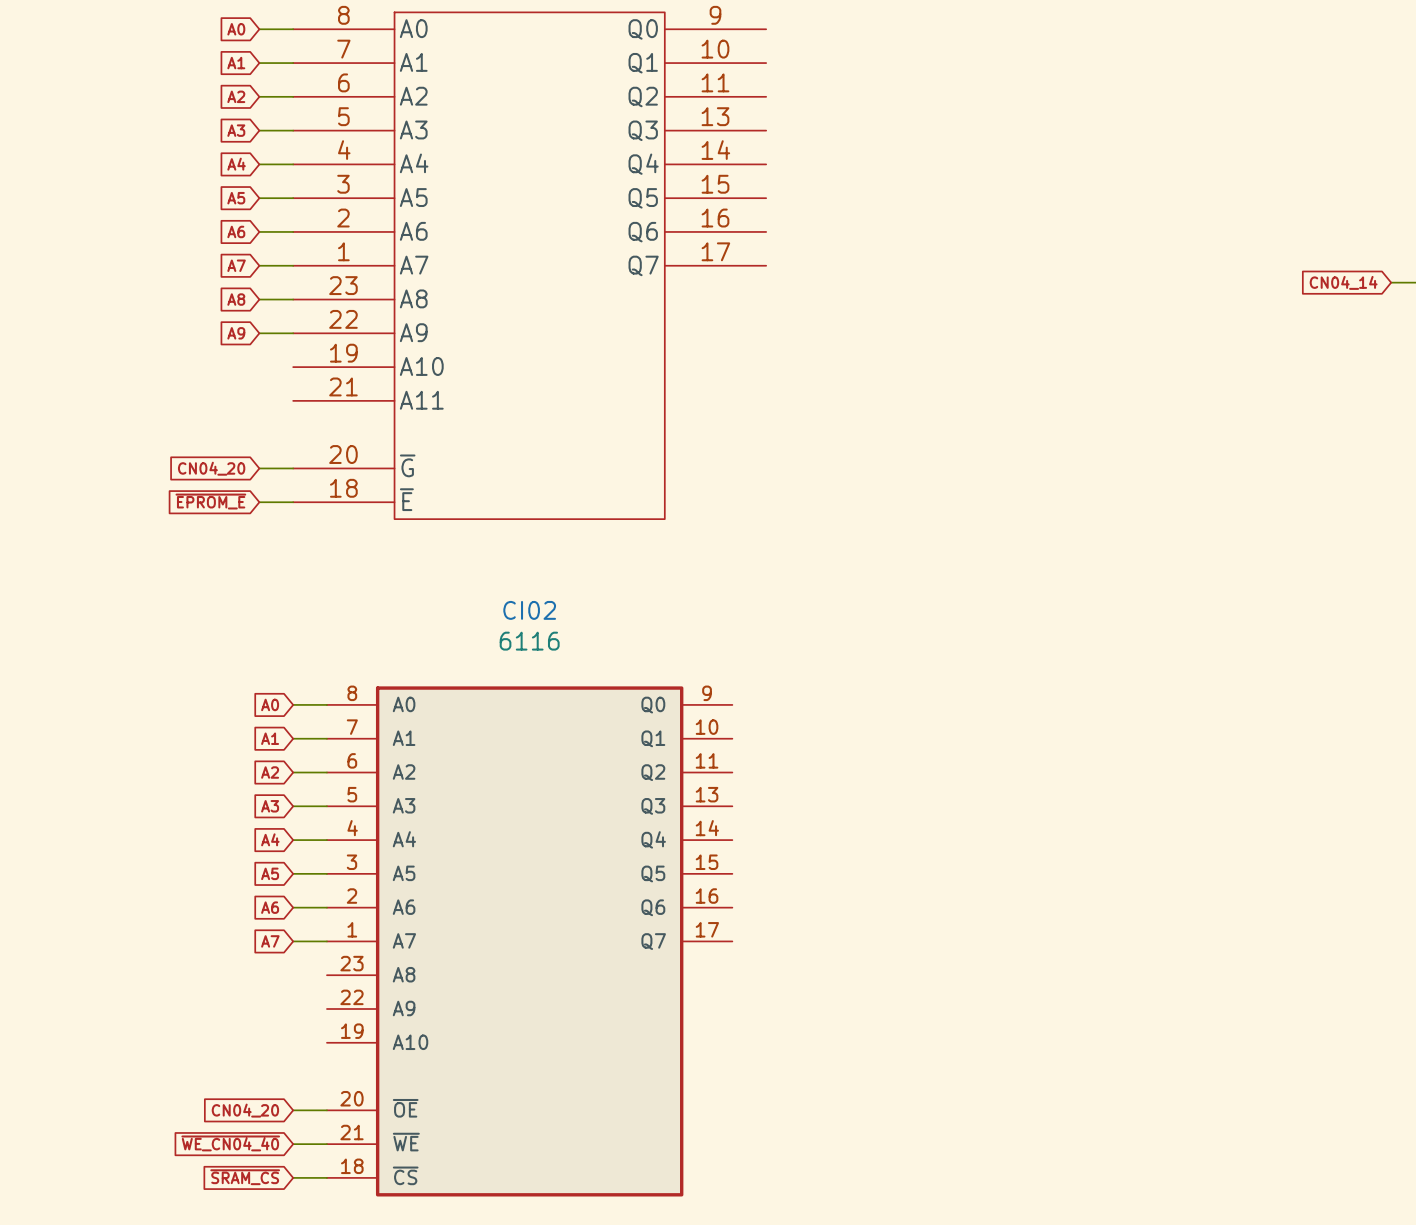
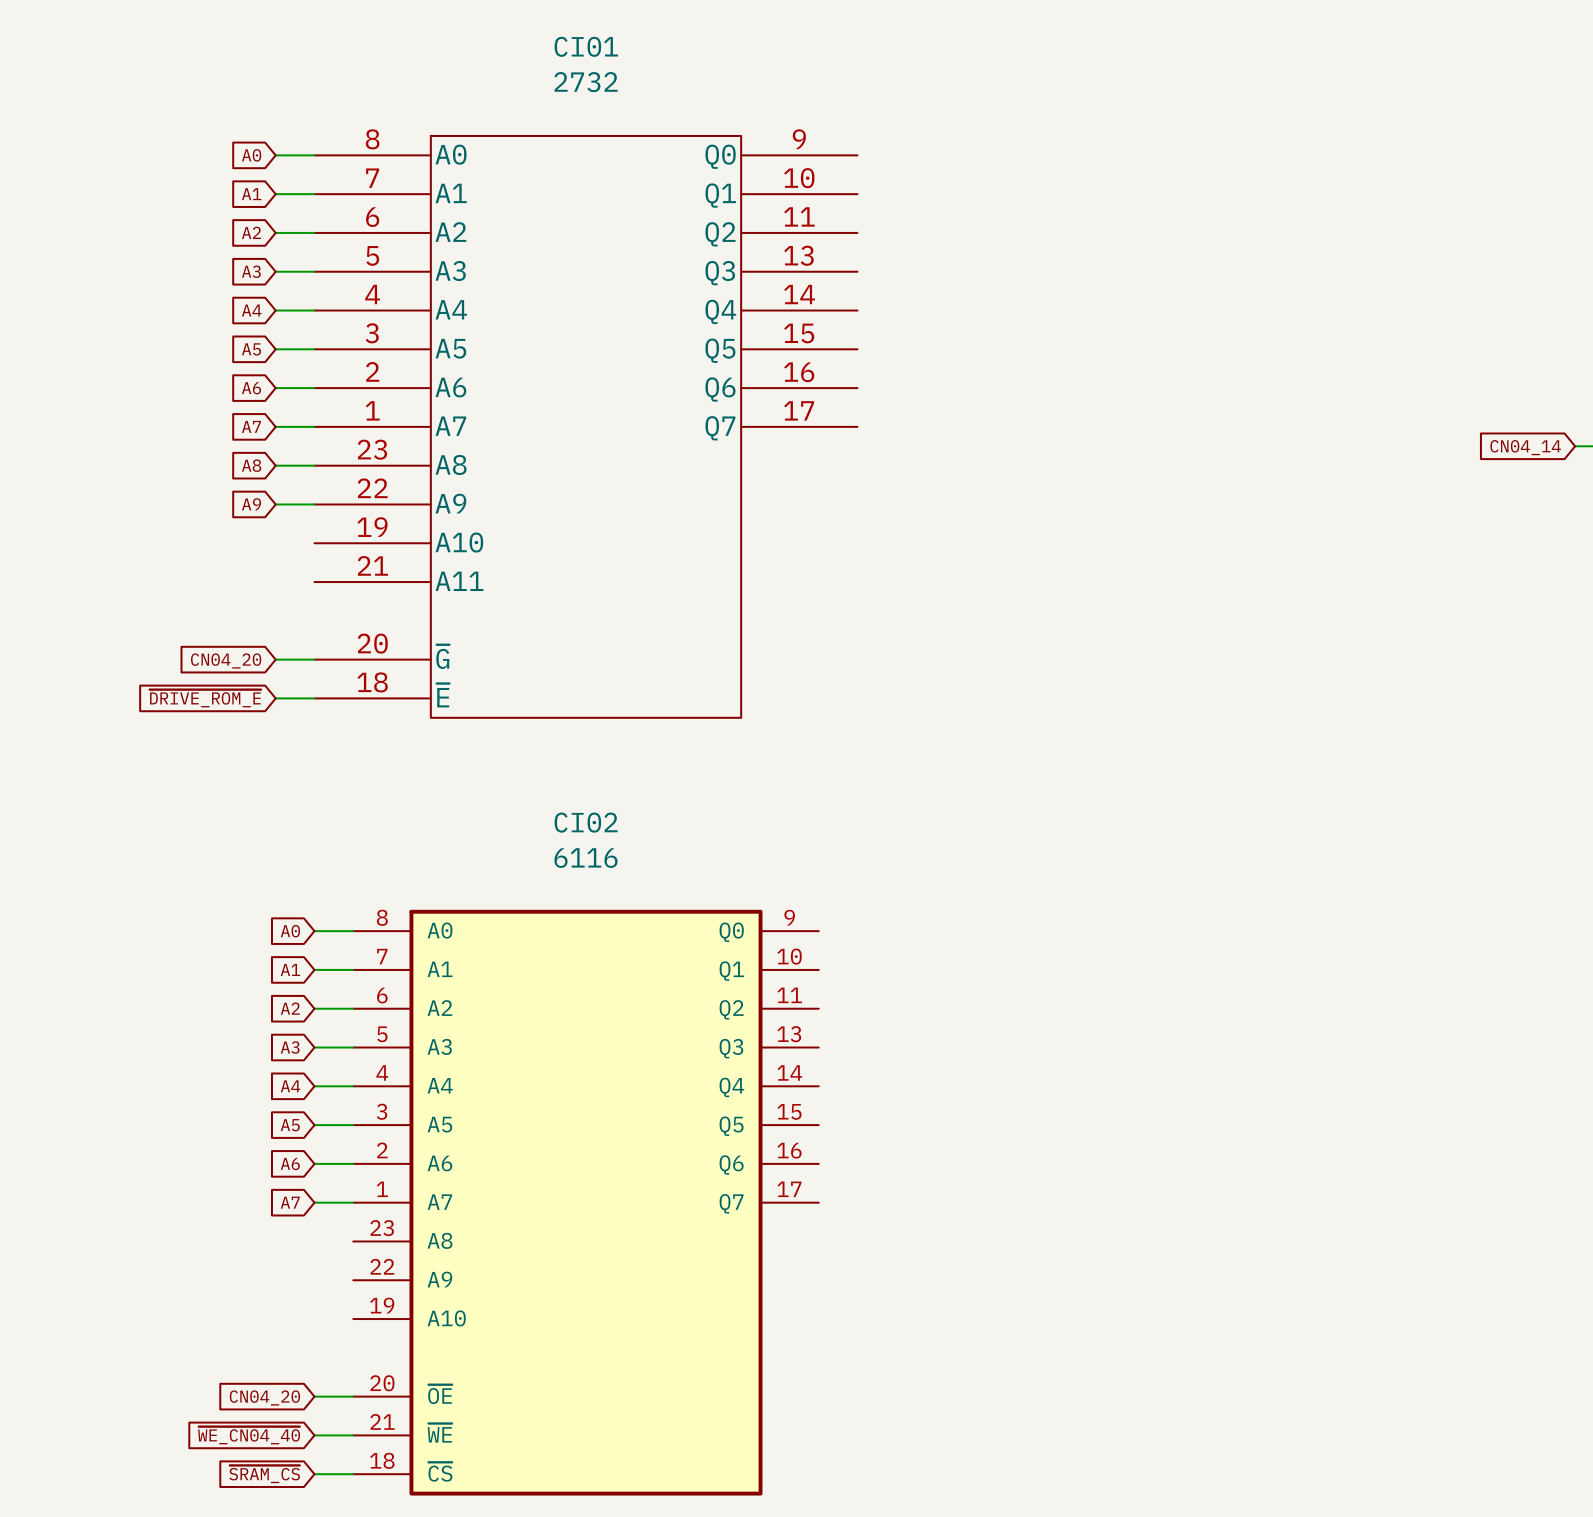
global label: ~{EPROM_E} (210, 501) -> ~{DRIVE_ROM_E} (205, 698)

